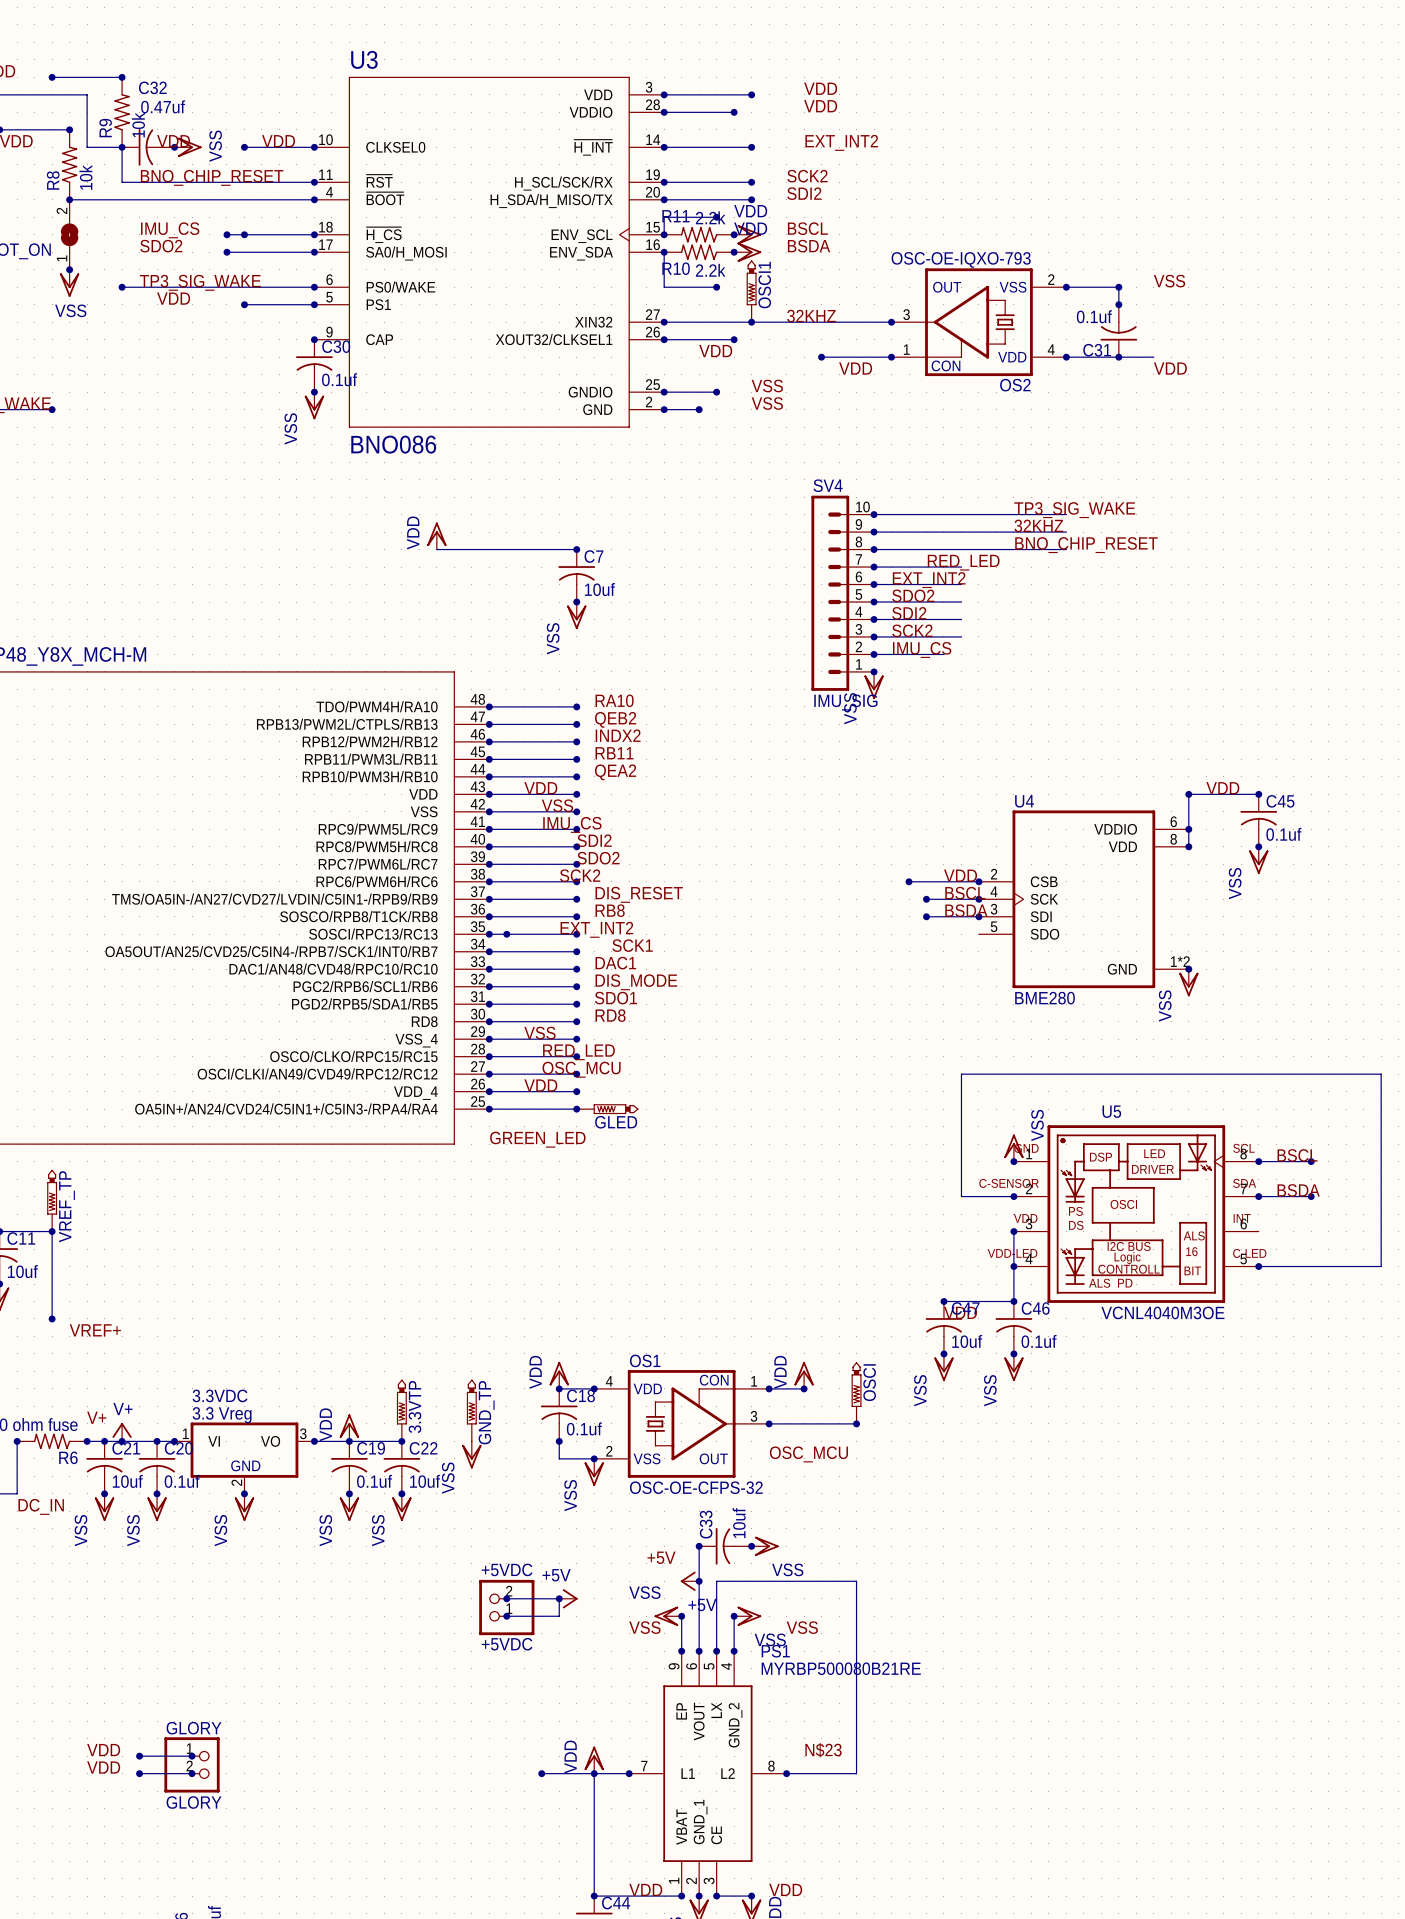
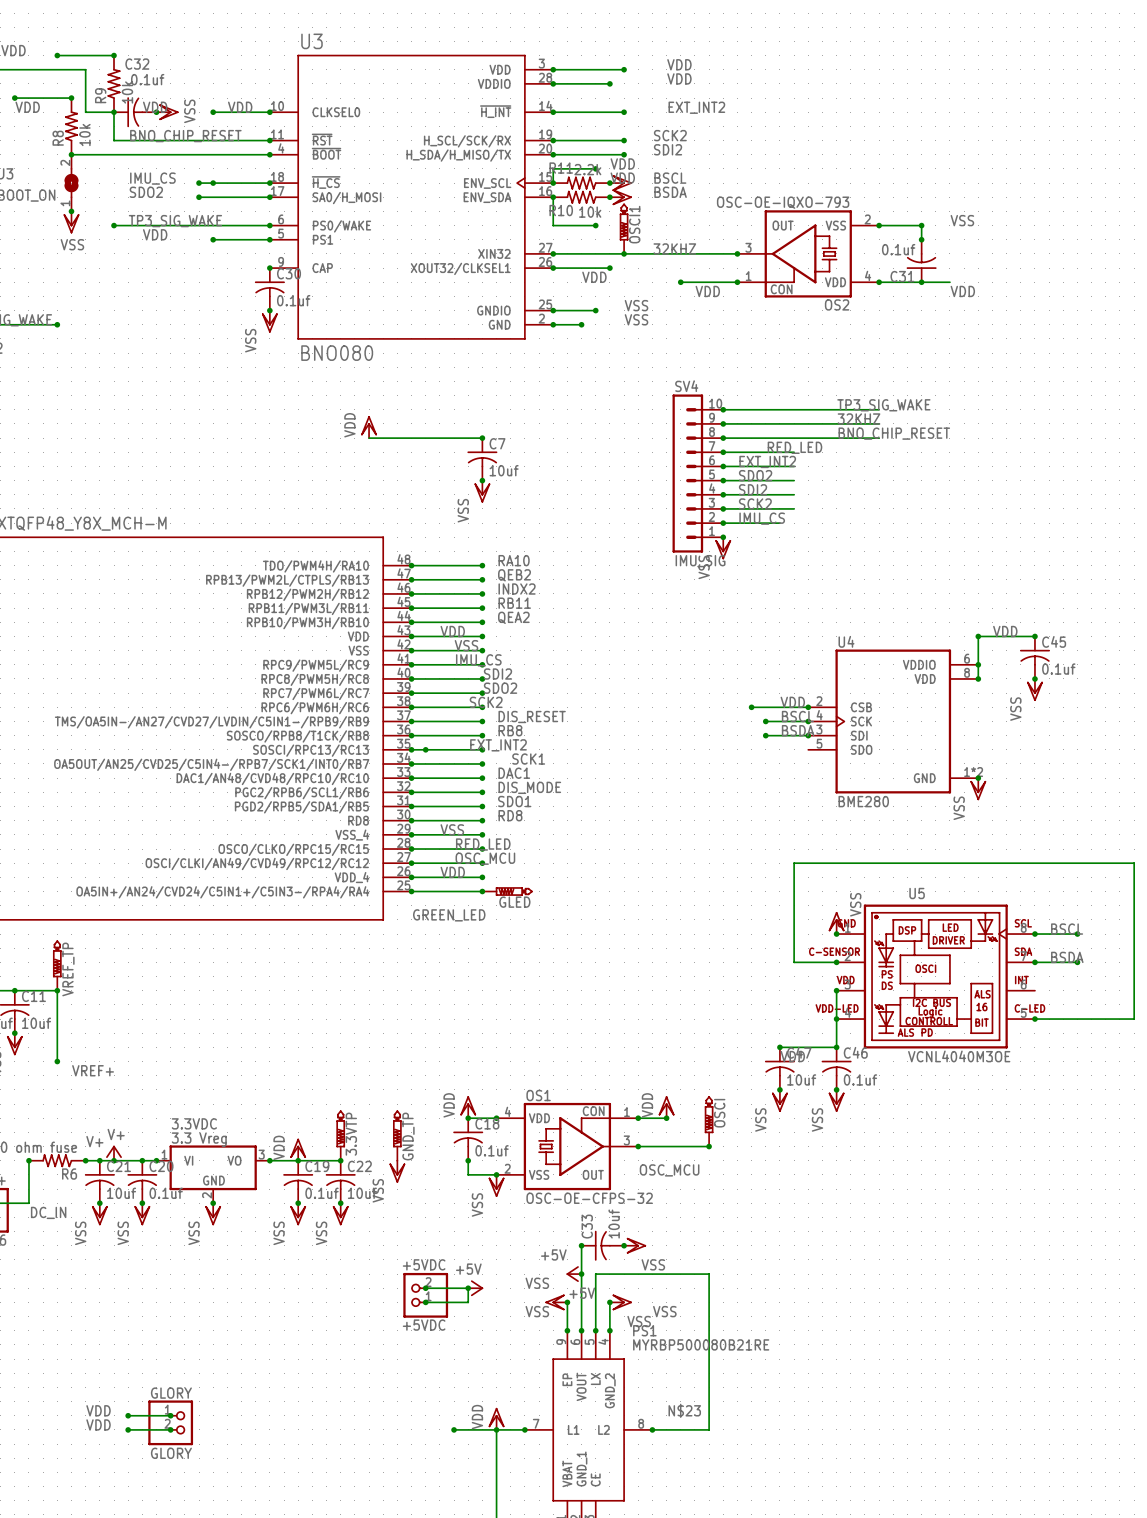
C32 value: 0.47uf (163, 106) -> 0.1uf (147, 79)
R10 value: 2.2k (710, 270) -> 10k (590, 212)
U3 value: BNO086 (393, 444) -> BNO080 (337, 353)

